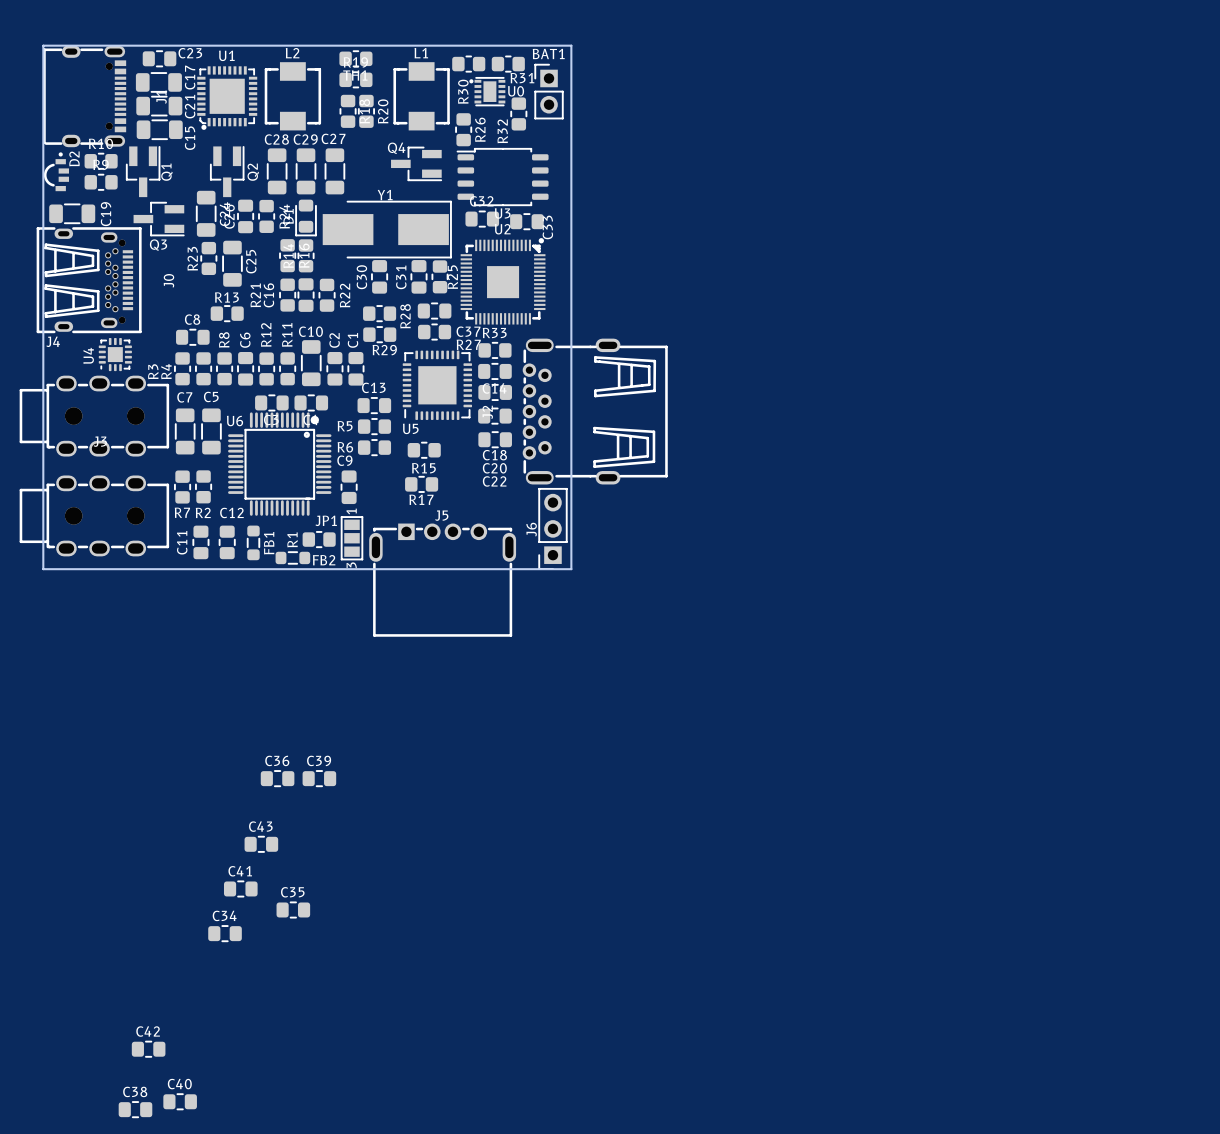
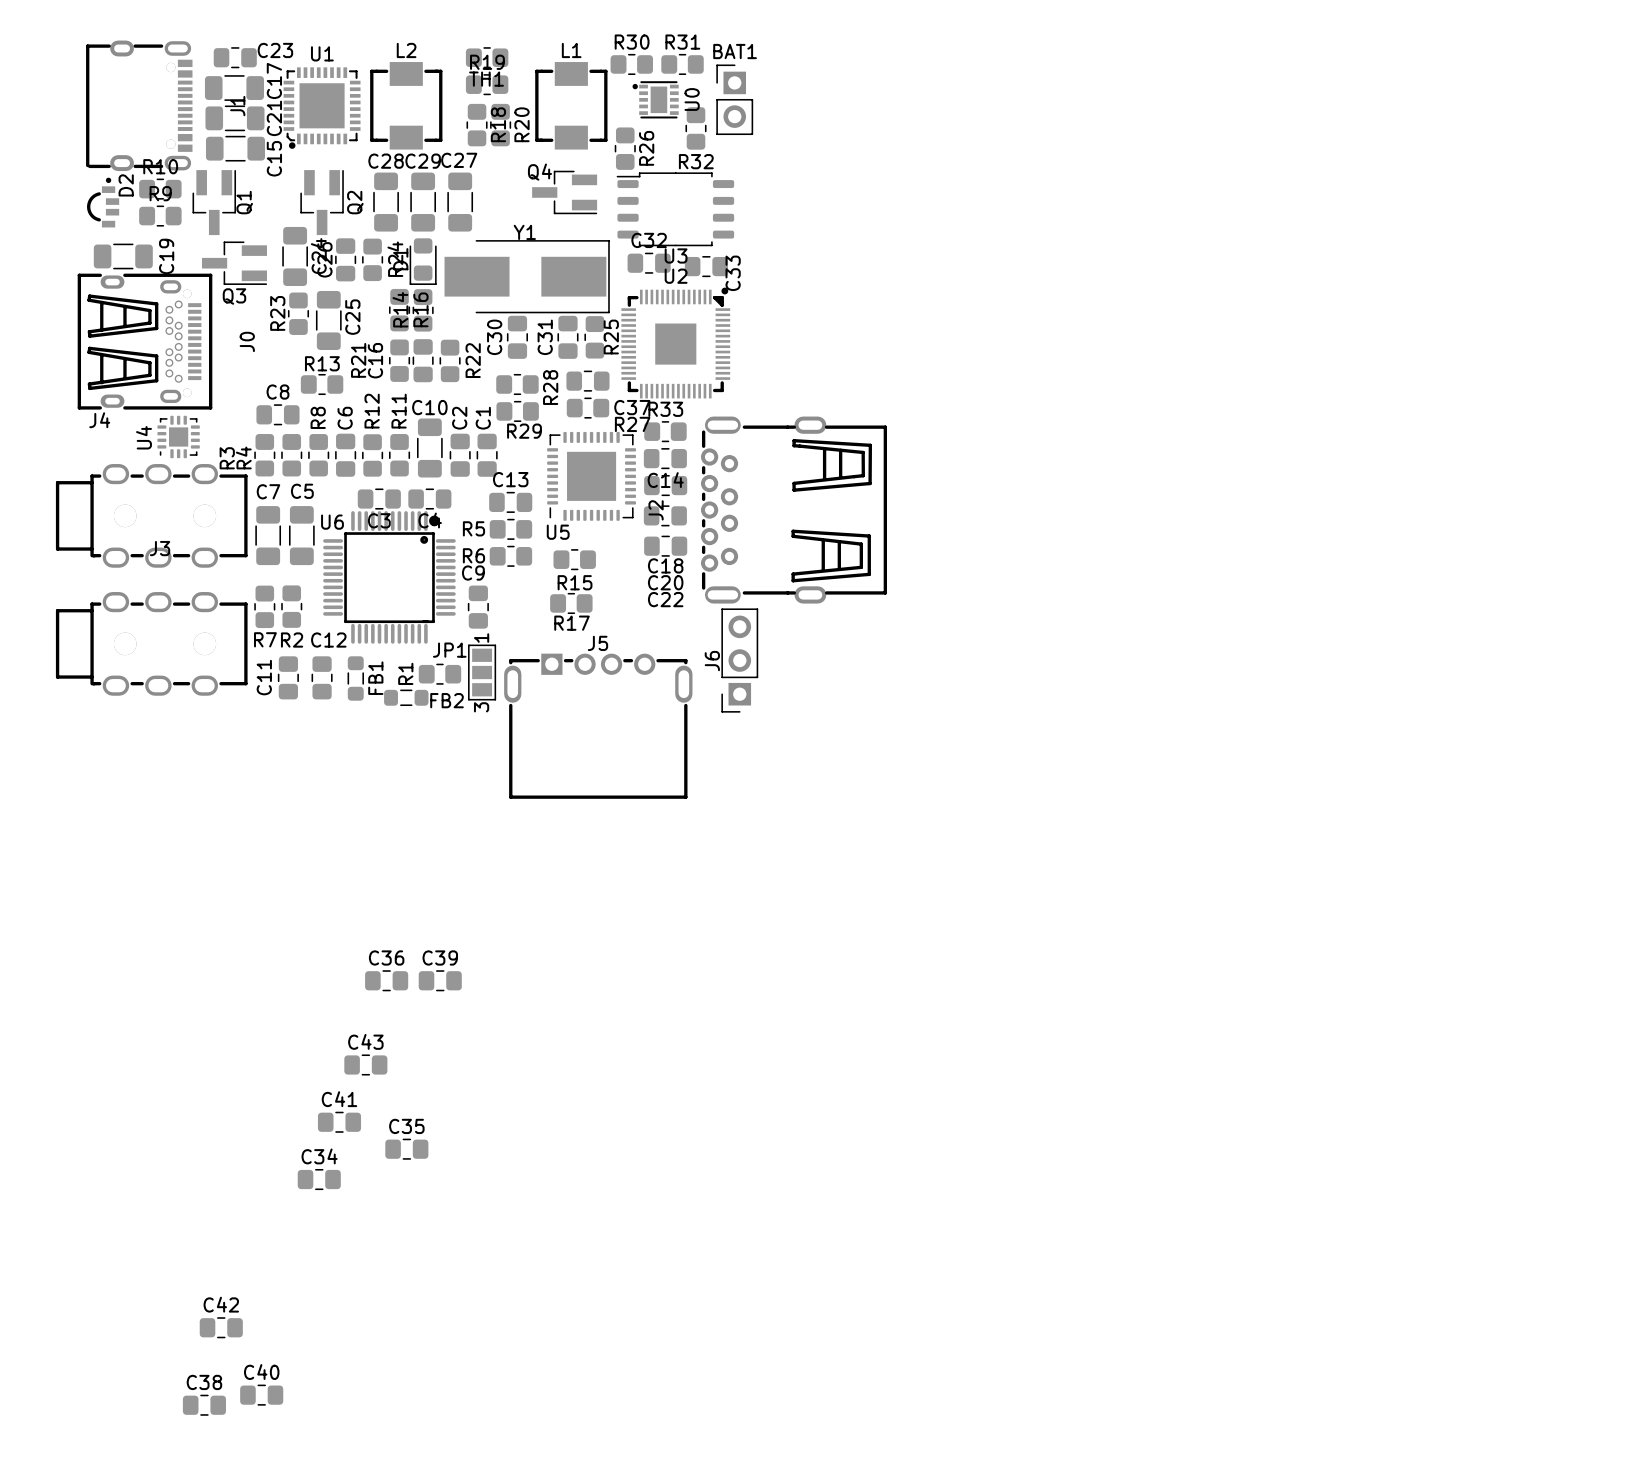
board edge: (43, 45) (571, 45) (571, 569) (43, 569) (43, 45) -> none
R31 name position: R31 (522, 78) -> R31 (682, 42)
R30 name rotation: 0° (463, 91) -> 90° clockwise (632, 42)
R30 name position: R30 (463, 91) -> R30 (632, 42)
U0 name rotation: 0° (516, 91) -> 90° counterclockwise (692, 99)
R32 name rotation: 0° (502, 131) -> 90° clockwise (696, 161)

